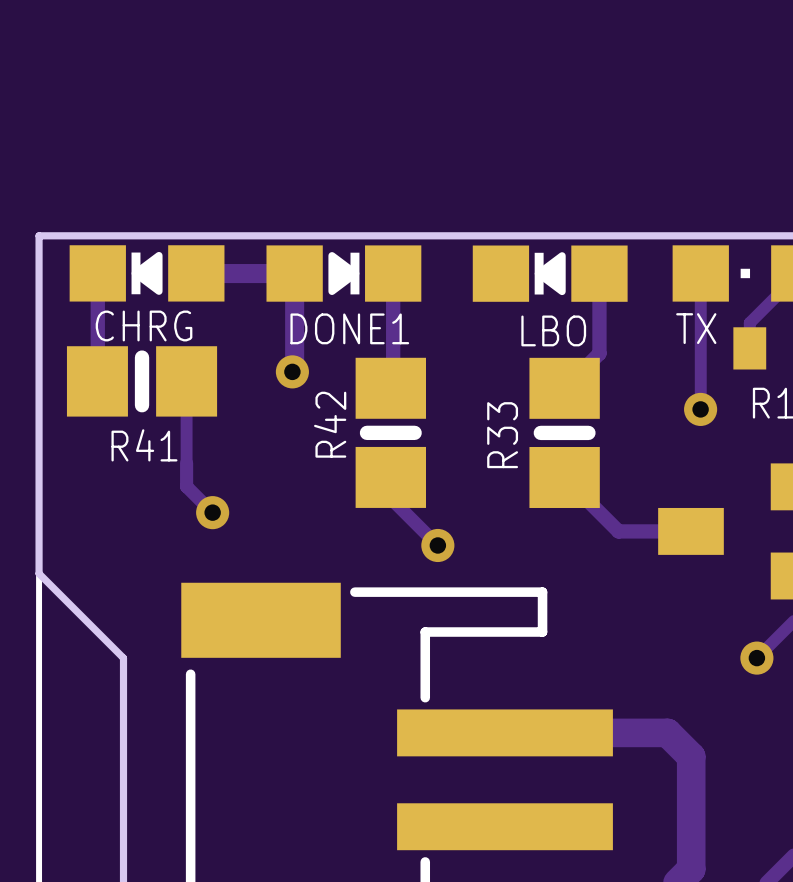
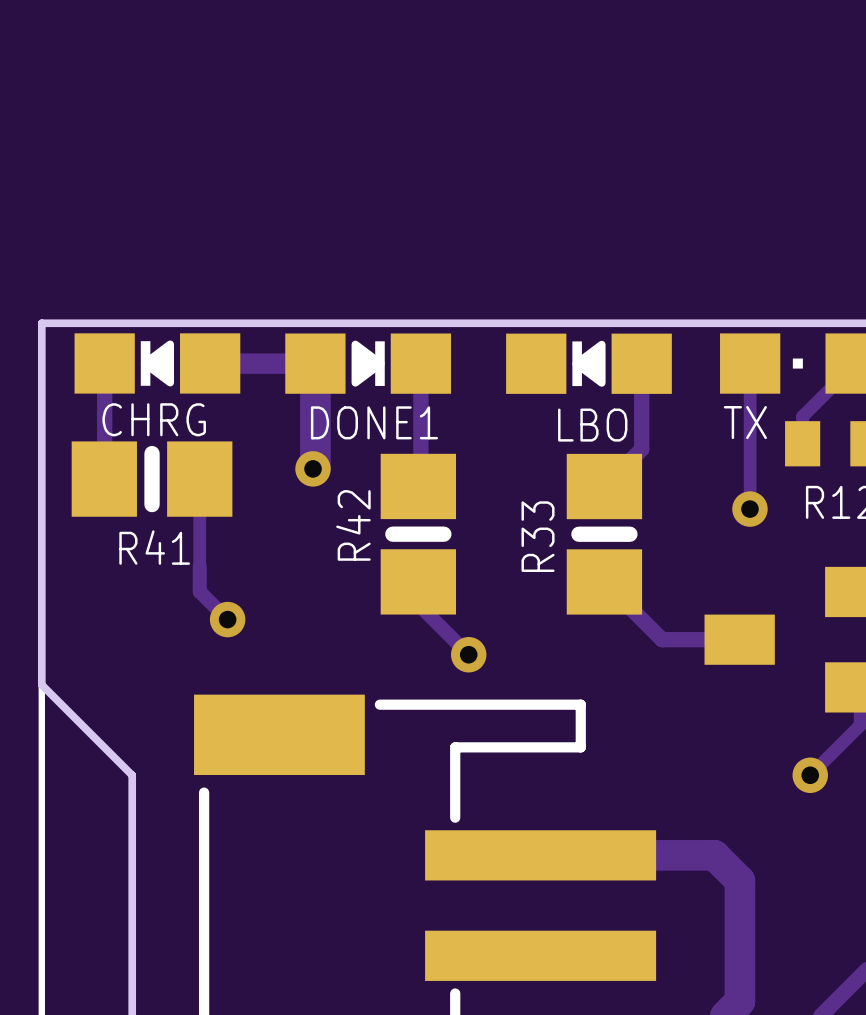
track width: thin (294, 273) (294, 369) -> thick (315, 363) (315, 466)

